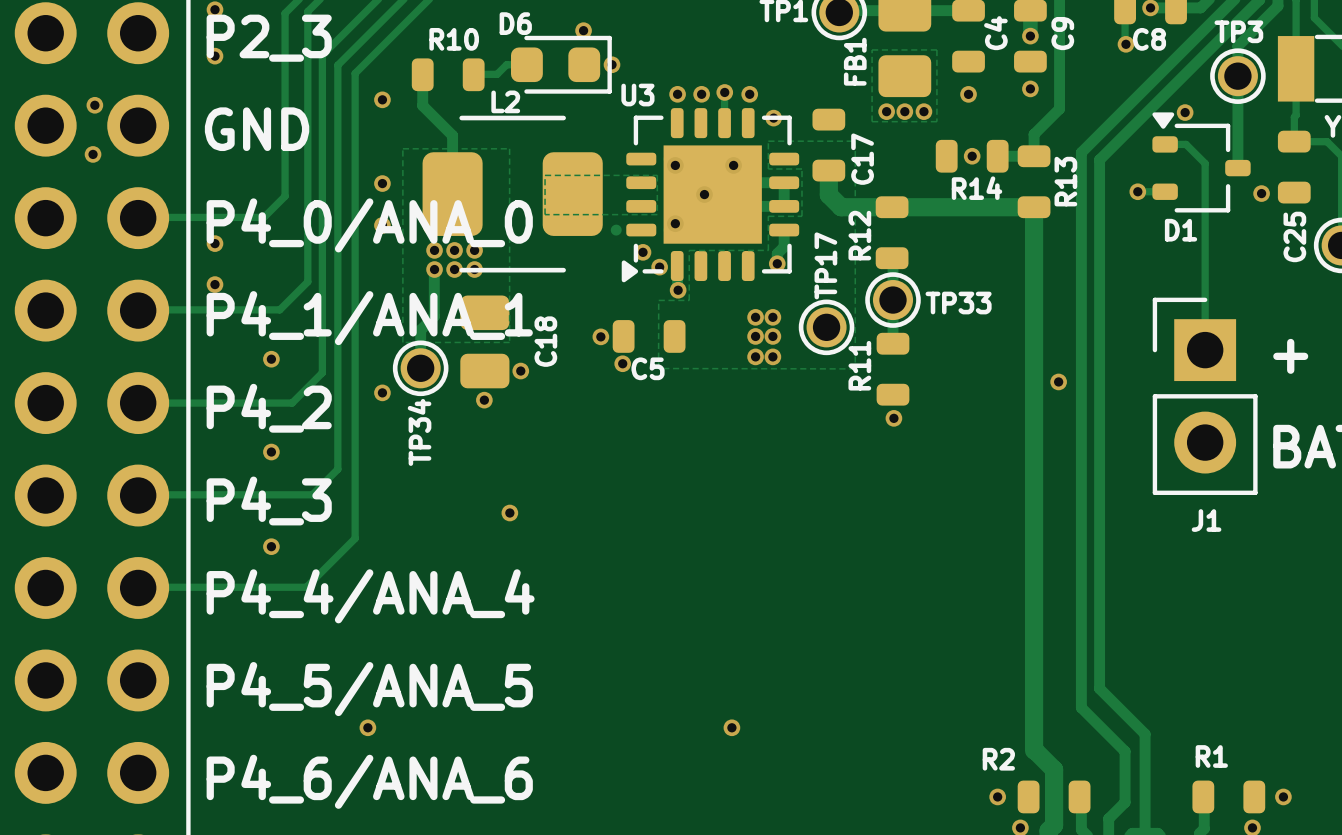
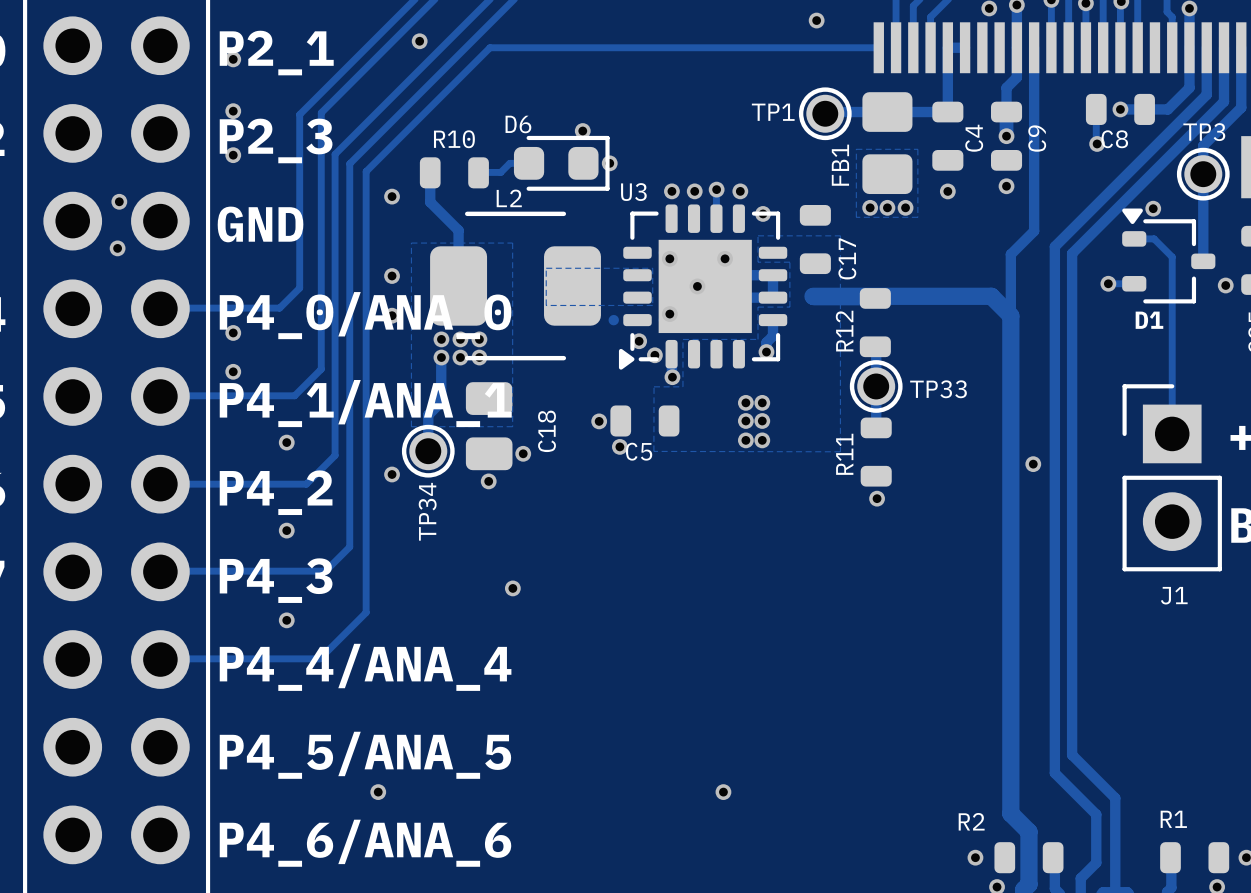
track: (1059, 108) (1034, 134) (1034, 156) (997, 156) -> none
R14: (972, 156) -> none
via: (972, 156) -> none
track: (828, 170) (828, 194) (841, 207) (1034, 207) (1034, 750) -> (1034, 205) (1034, 231) (1010, 254) (1010, 813)
R13: (1034, 181) -> none
track: none -> (812, 296) (991, 296) (1010, 315)
TP17: (826, 327) -> none

